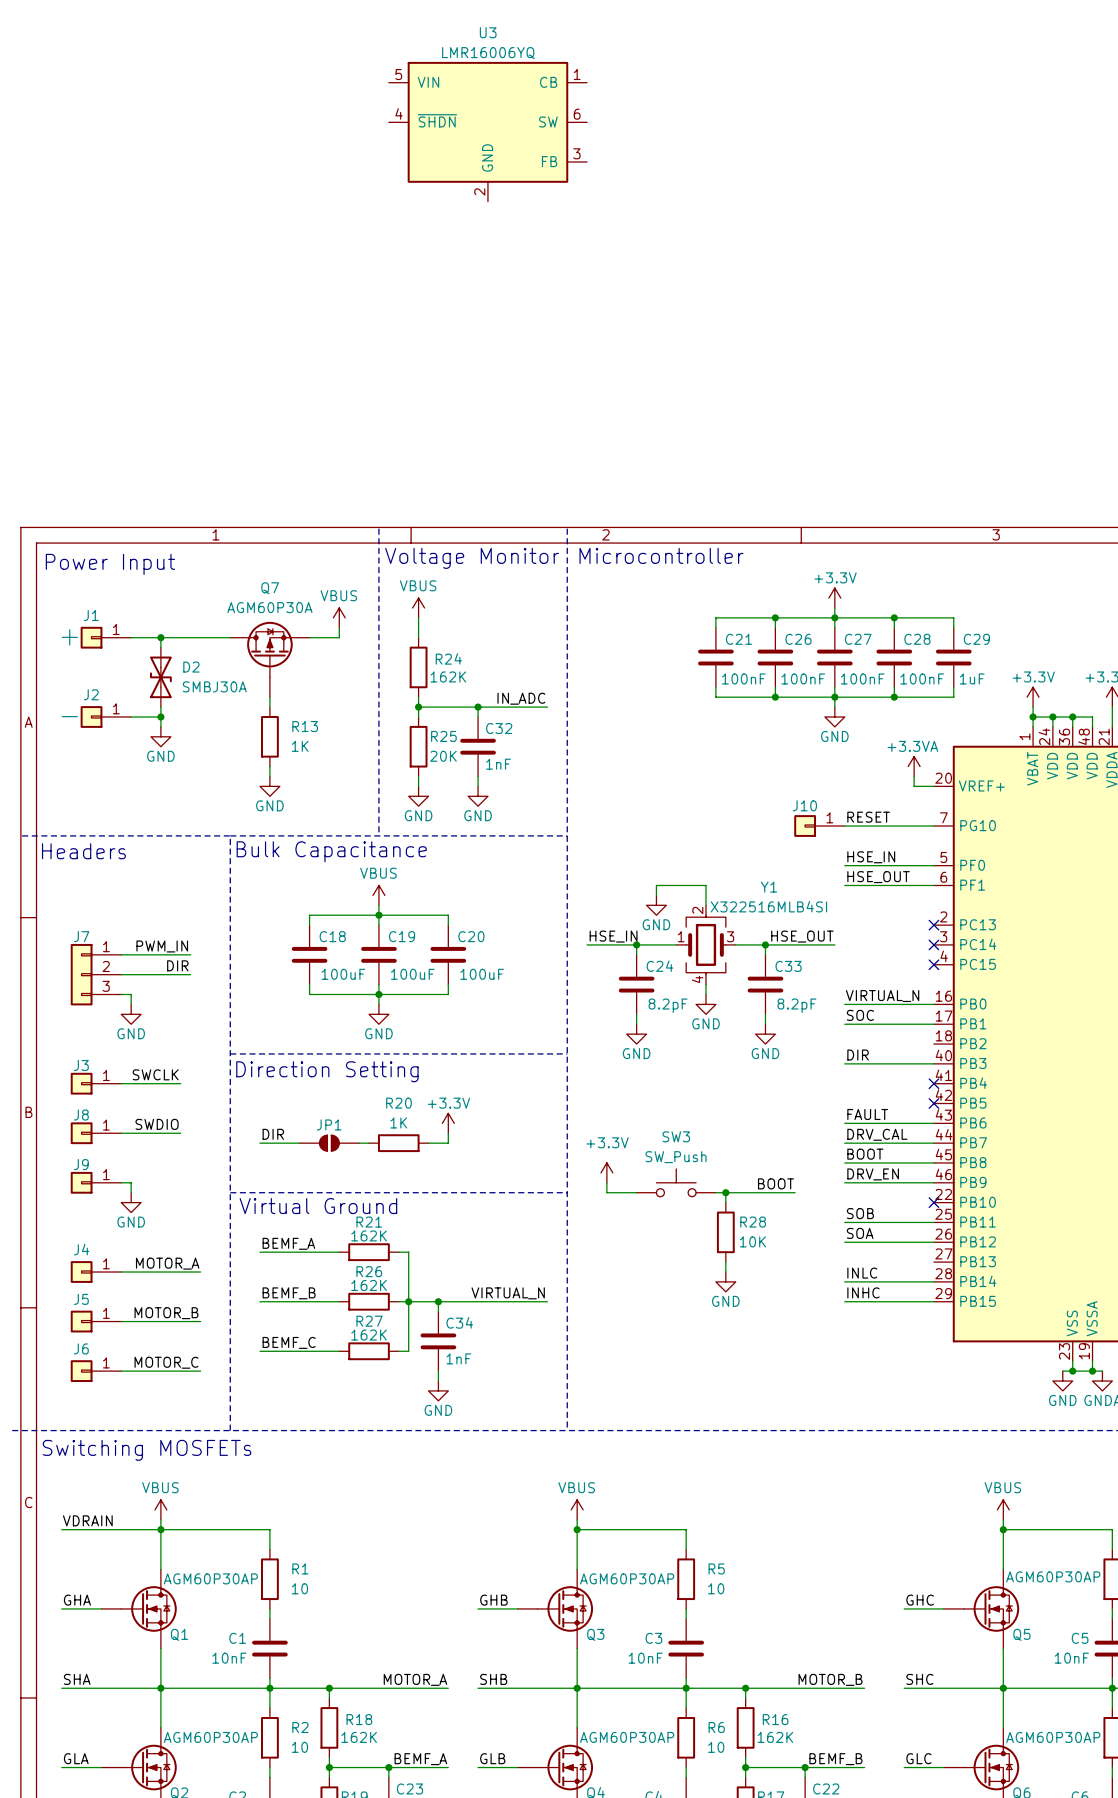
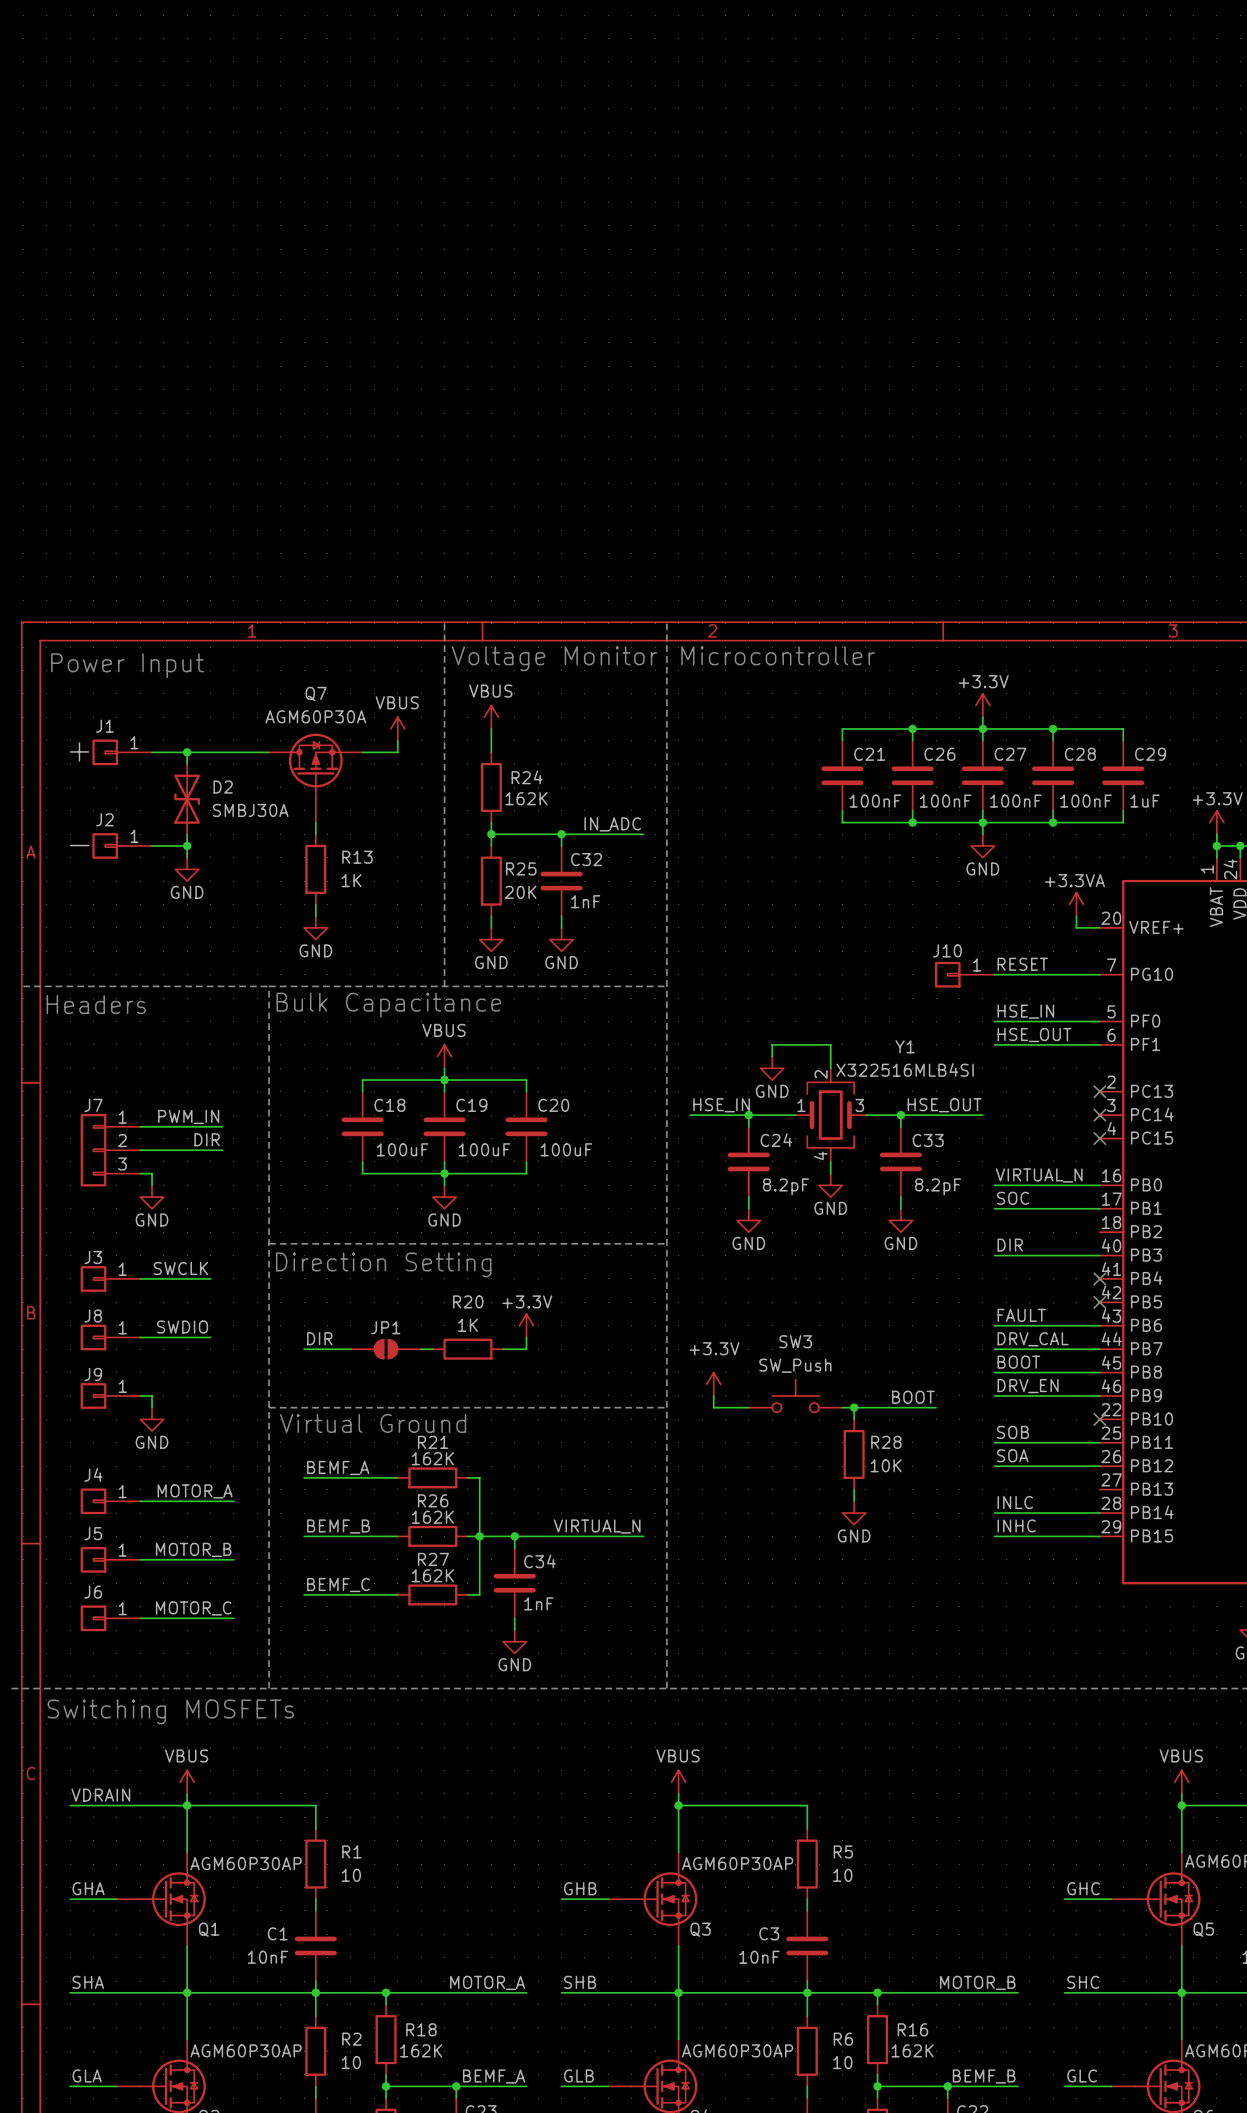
U3: LMR16006YQ (487, 131) -> none

